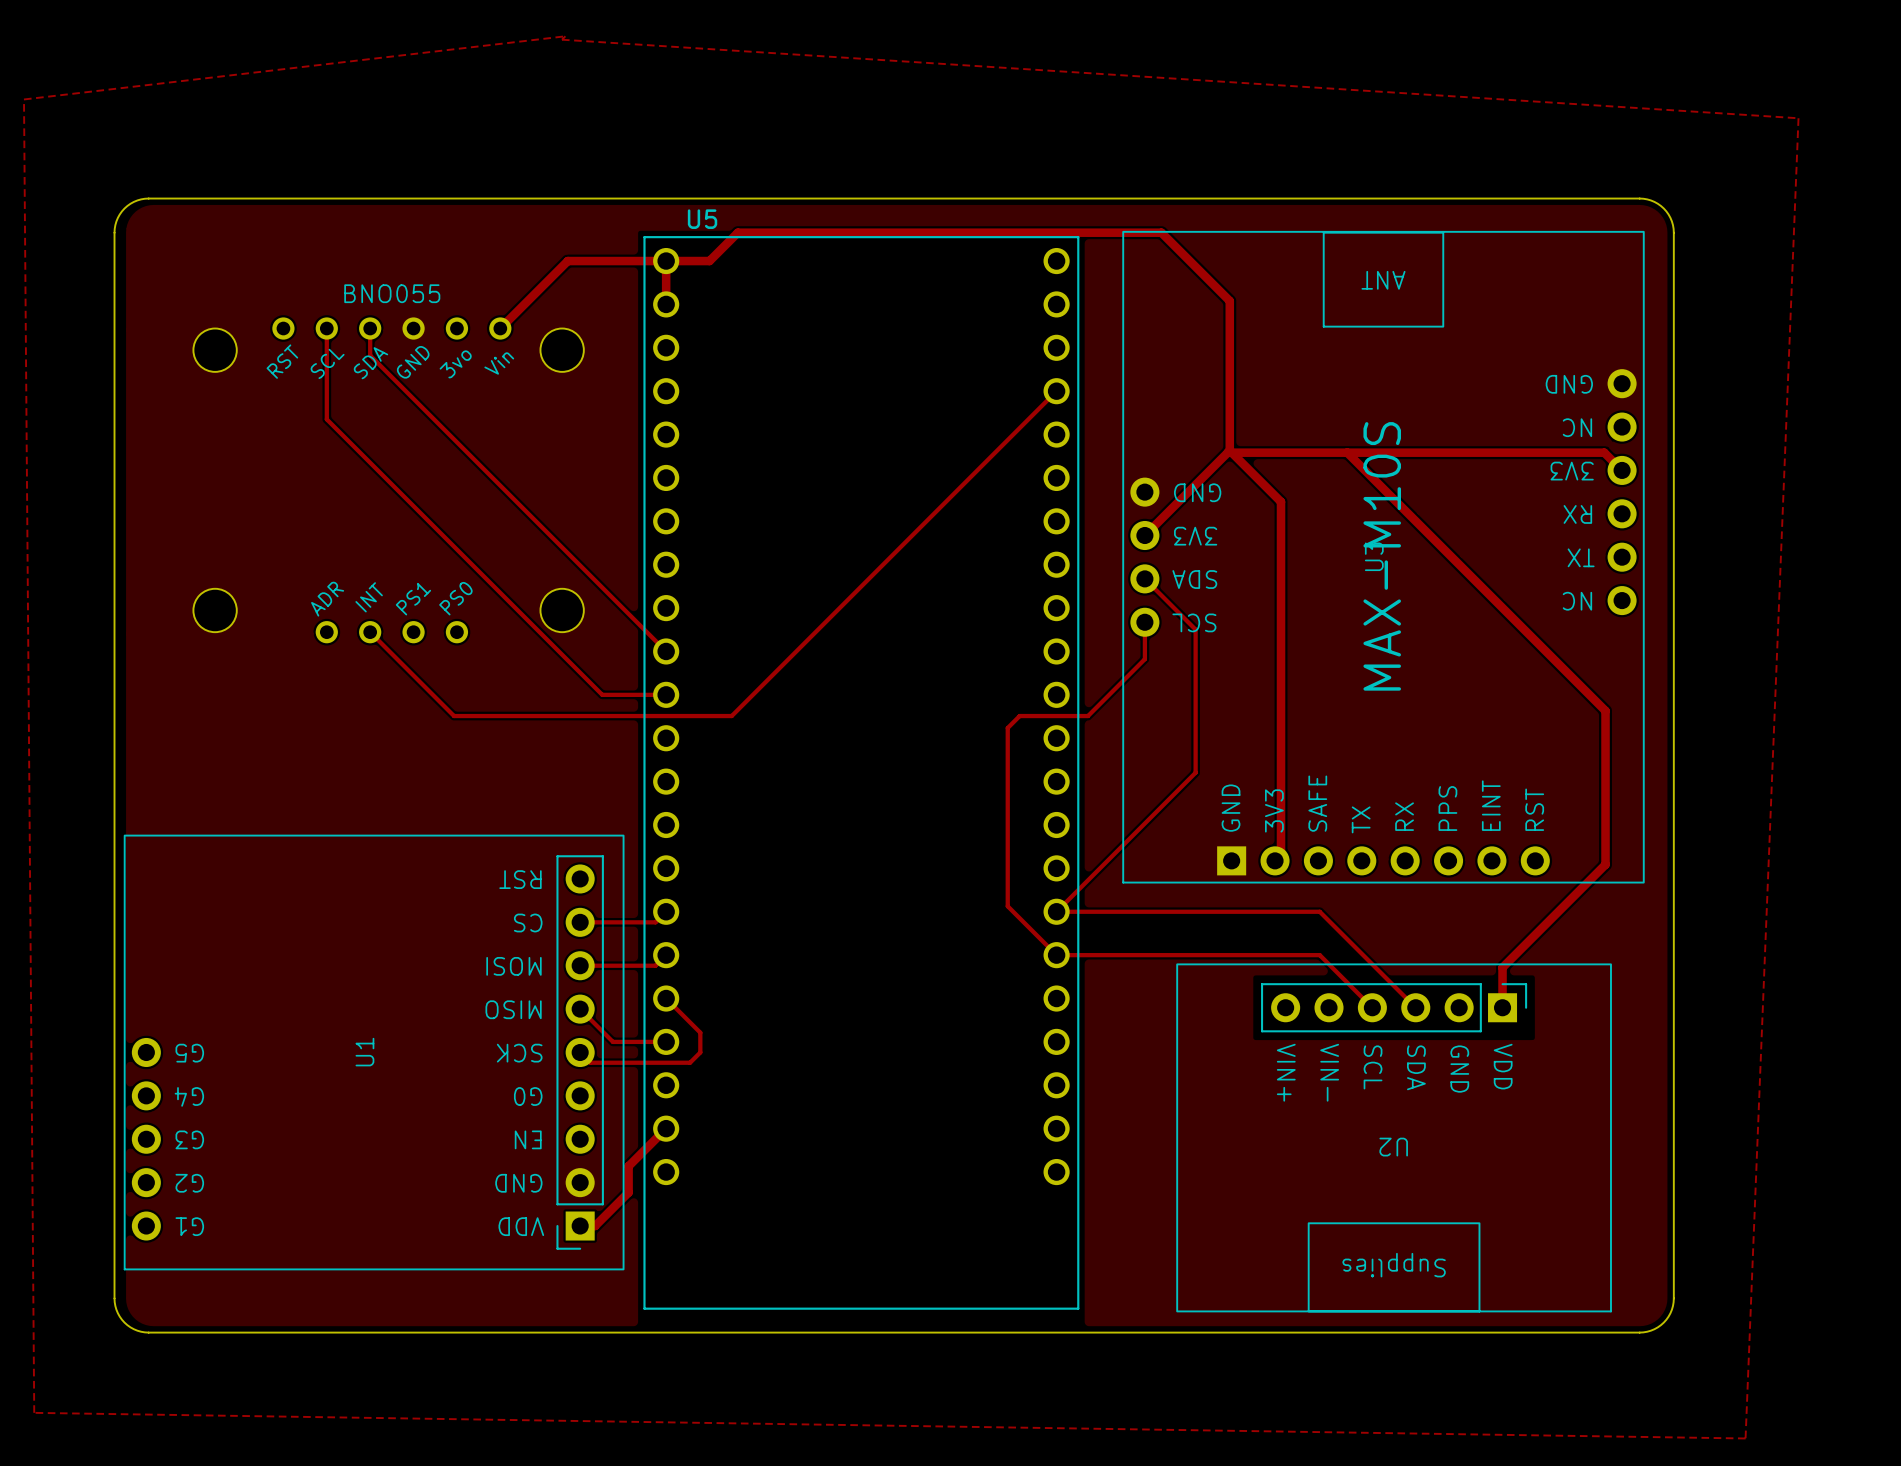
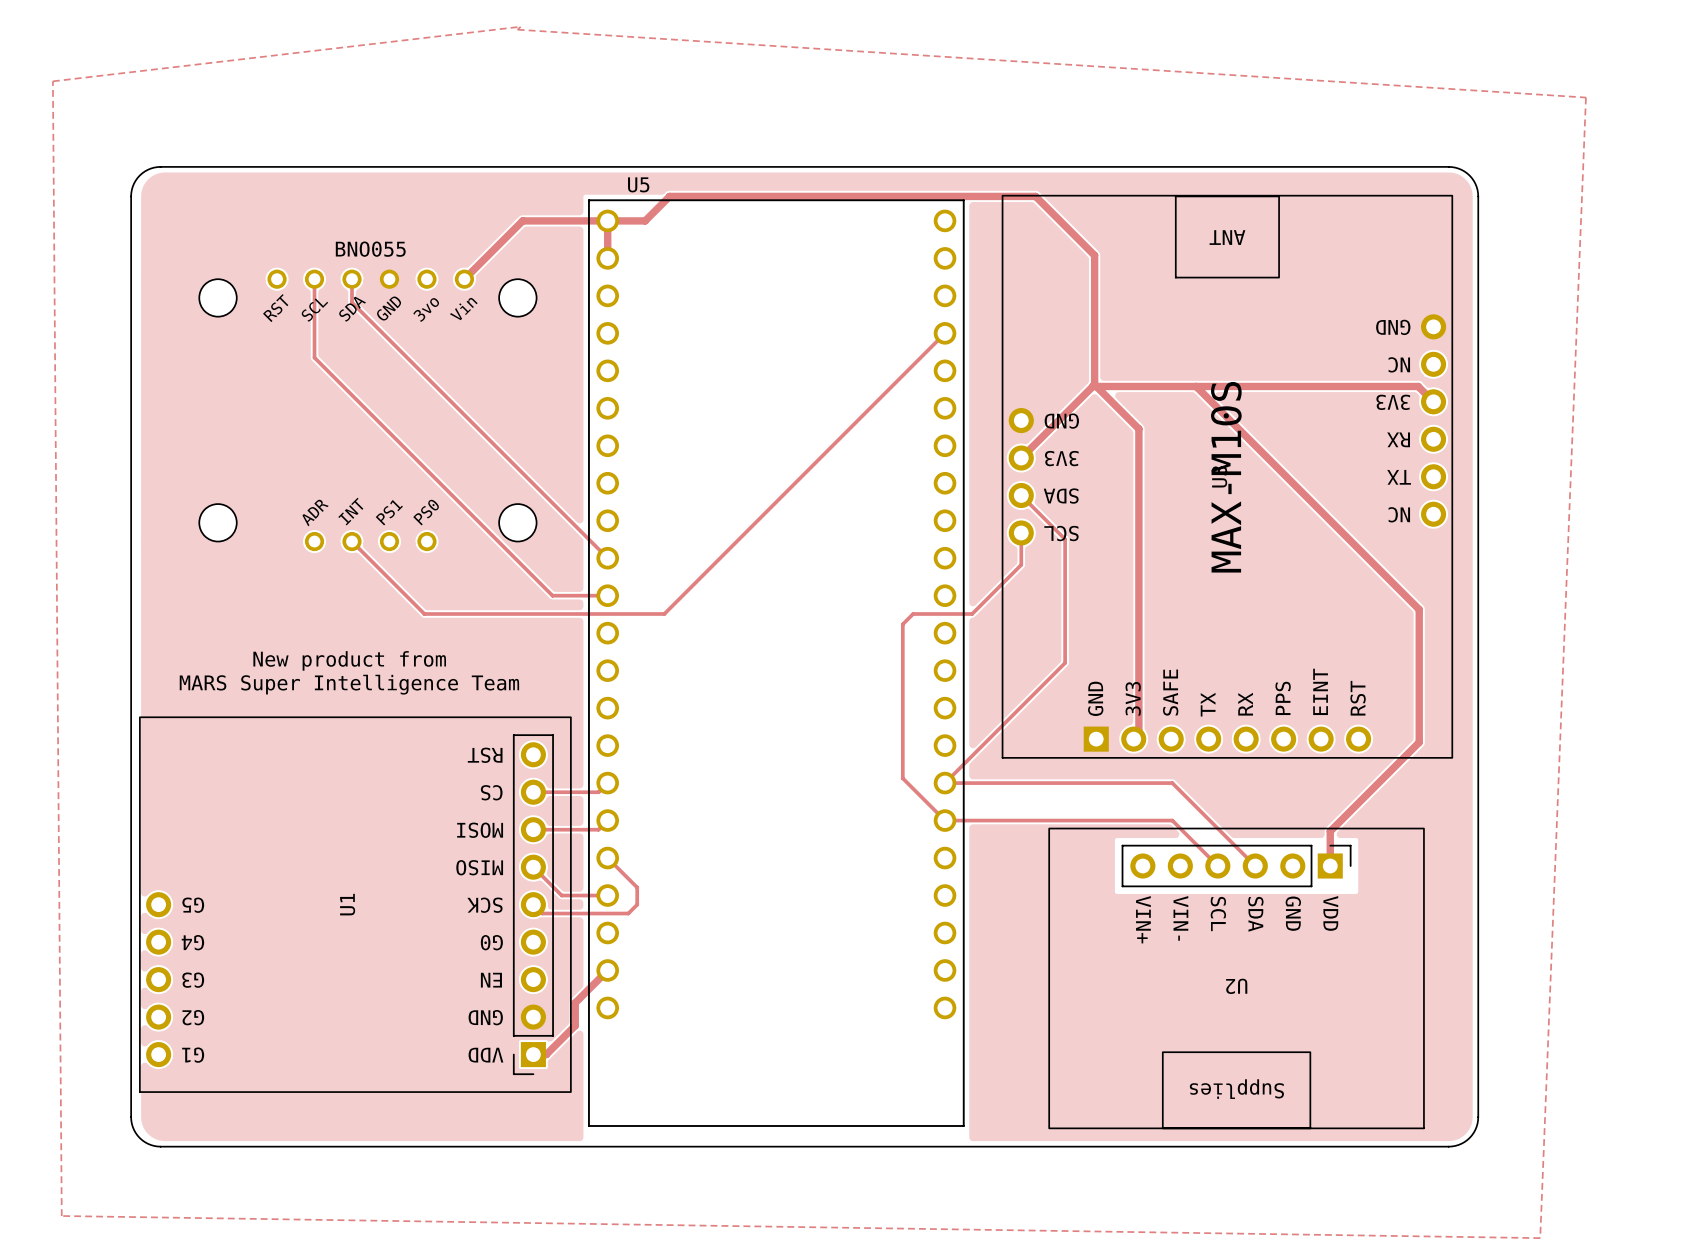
text: none -> New product from (349, 660)
text: none -> MARS Super Intelligence Team (349, 684)

